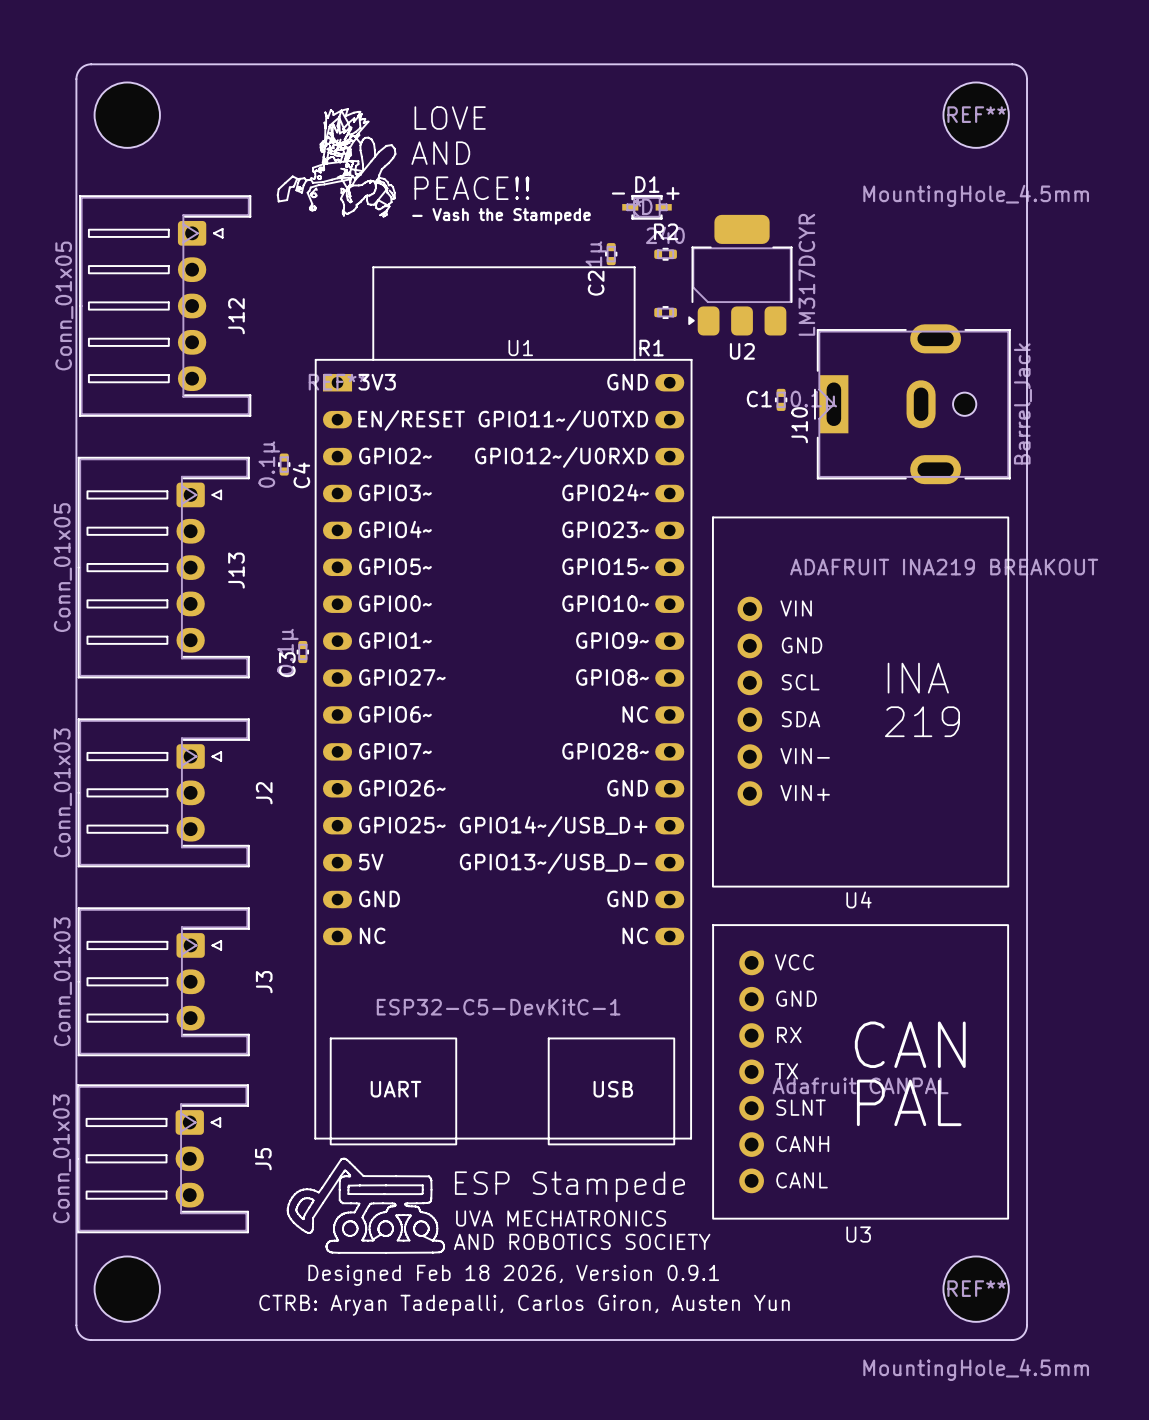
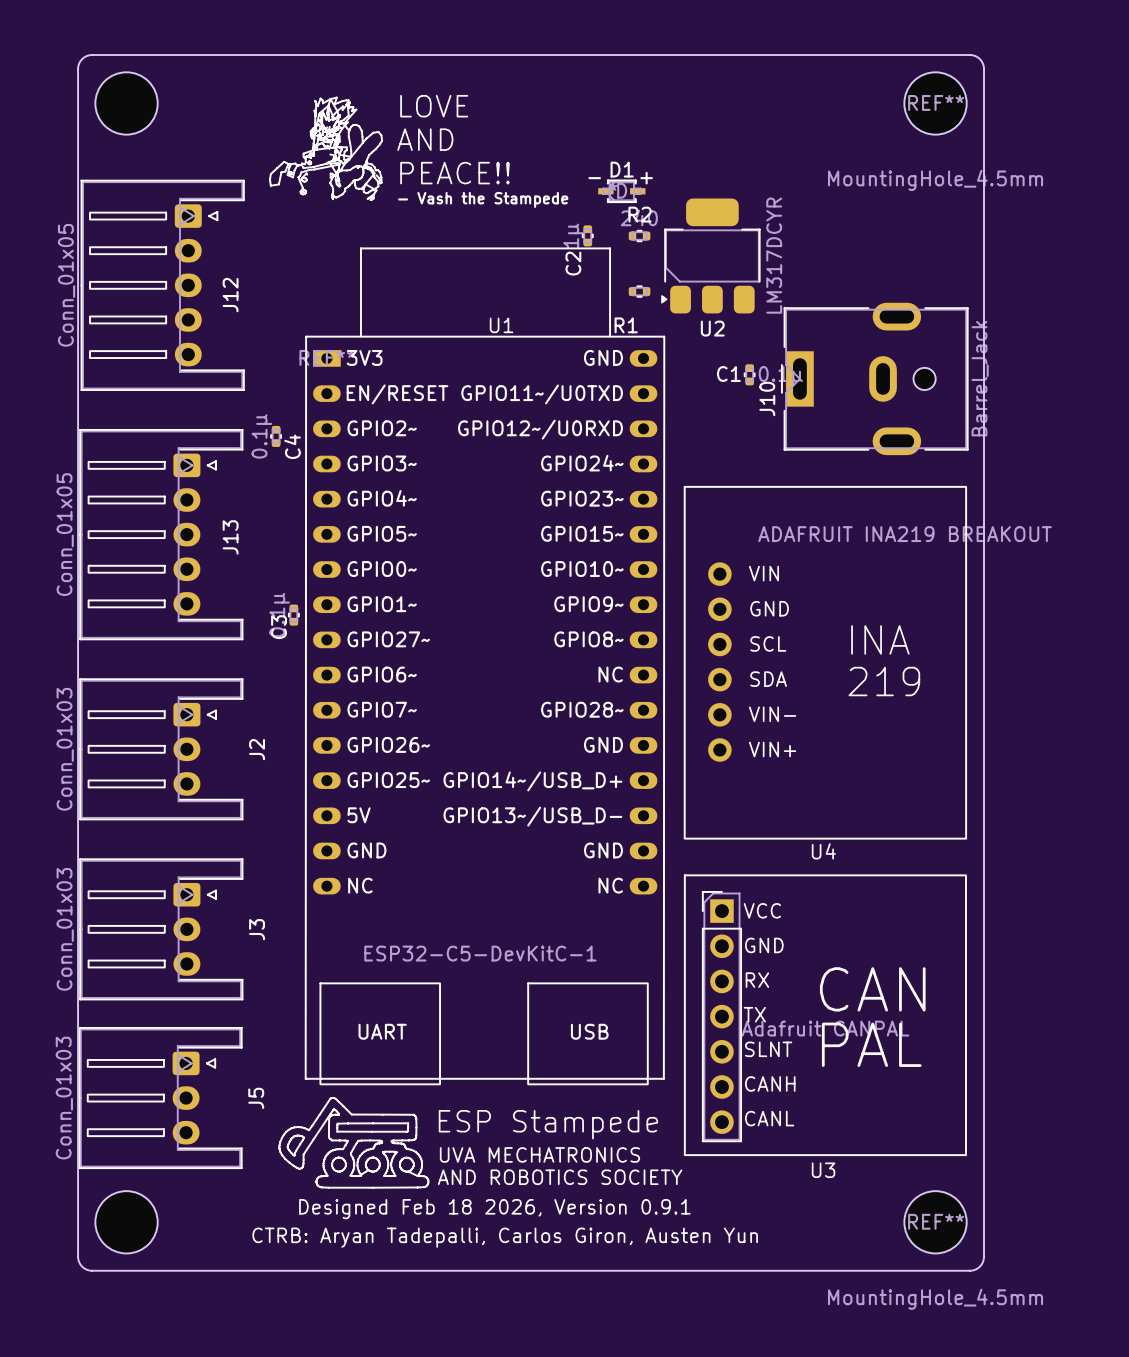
U3 footprint: [712, 924, 1009, 1220] -> [684, 874, 967, 1156]

